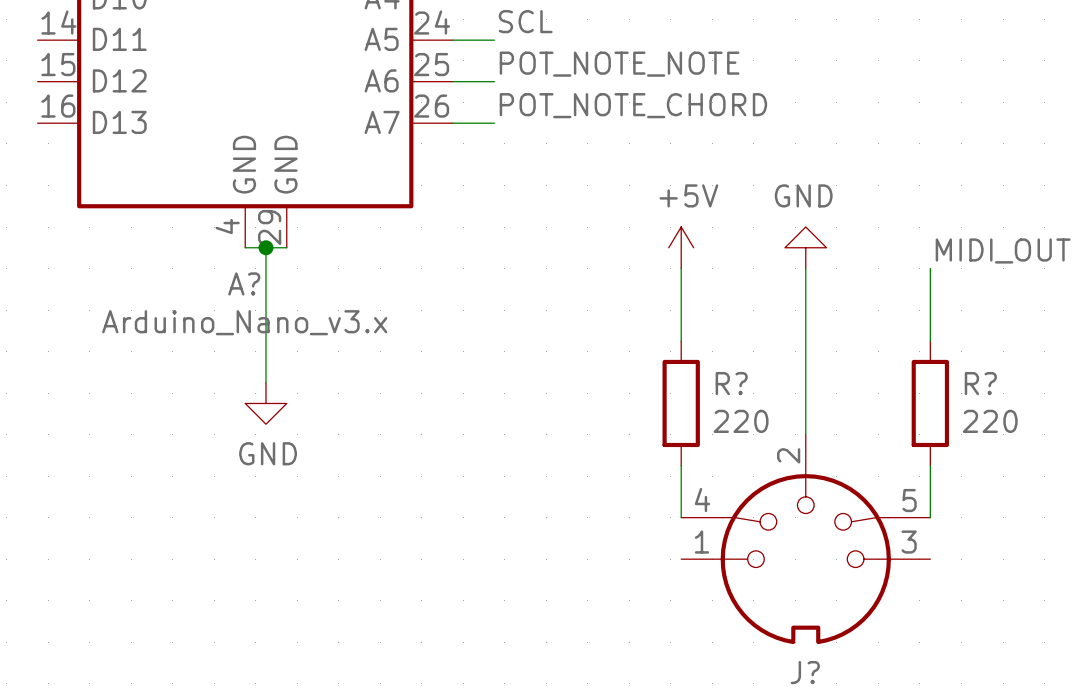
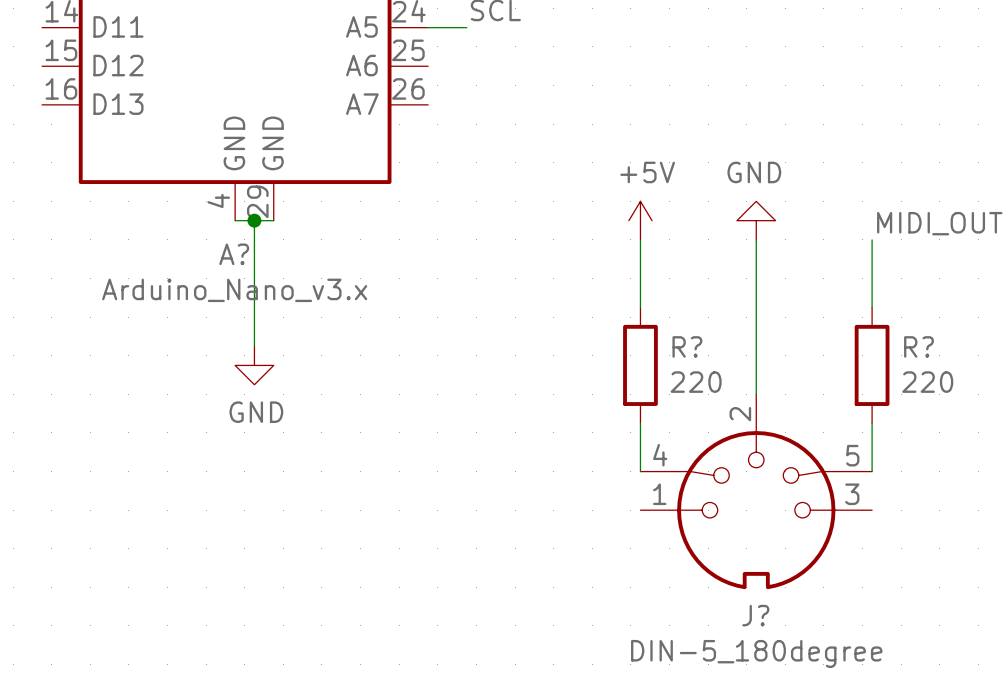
label: POT_NOTE_NOTE (619, 64) -> none
wire: (452, 81) (494, 81) -> none
label: POT_NOTE_CHORD (633, 105) -> none
wire: (452, 123) (494, 123) -> none

